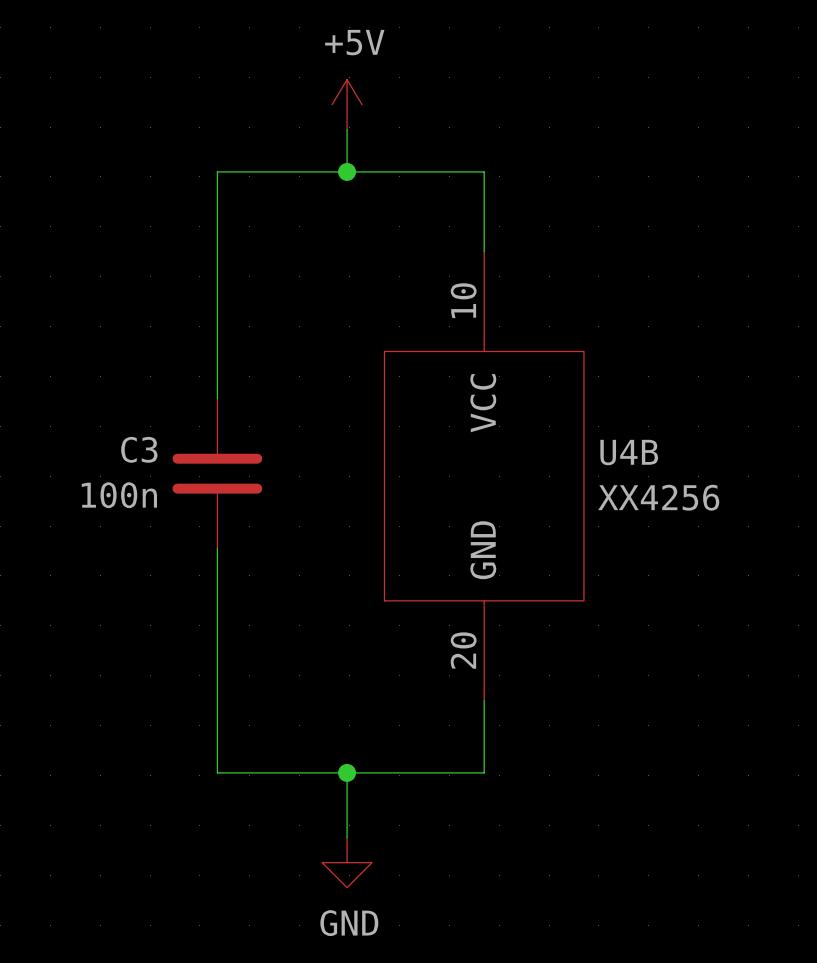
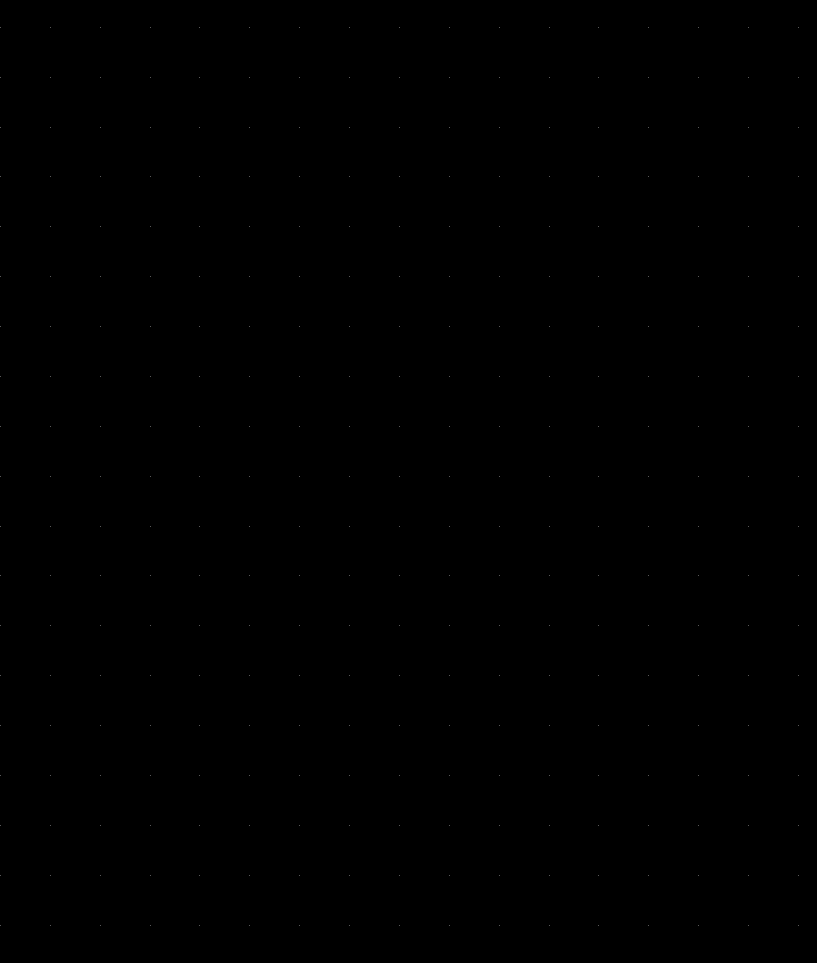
power symbol: +5V (347, 104) -> none
wire: (347, 129) (347, 171) -> none
junction: (347, 171) -> none
wire: (484, 251) (484, 171) (217, 171) (217, 398) -> none
C3: 100n (217, 473) -> none
U4B: XX4256 (484, 476) -> none
wire: (217, 548) (217, 772) (484, 772) (484, 700) -> none
wire: (347, 772) (347, 837) -> none
junction: (347, 772) -> none
power symbol: GND (347, 862) -> none

